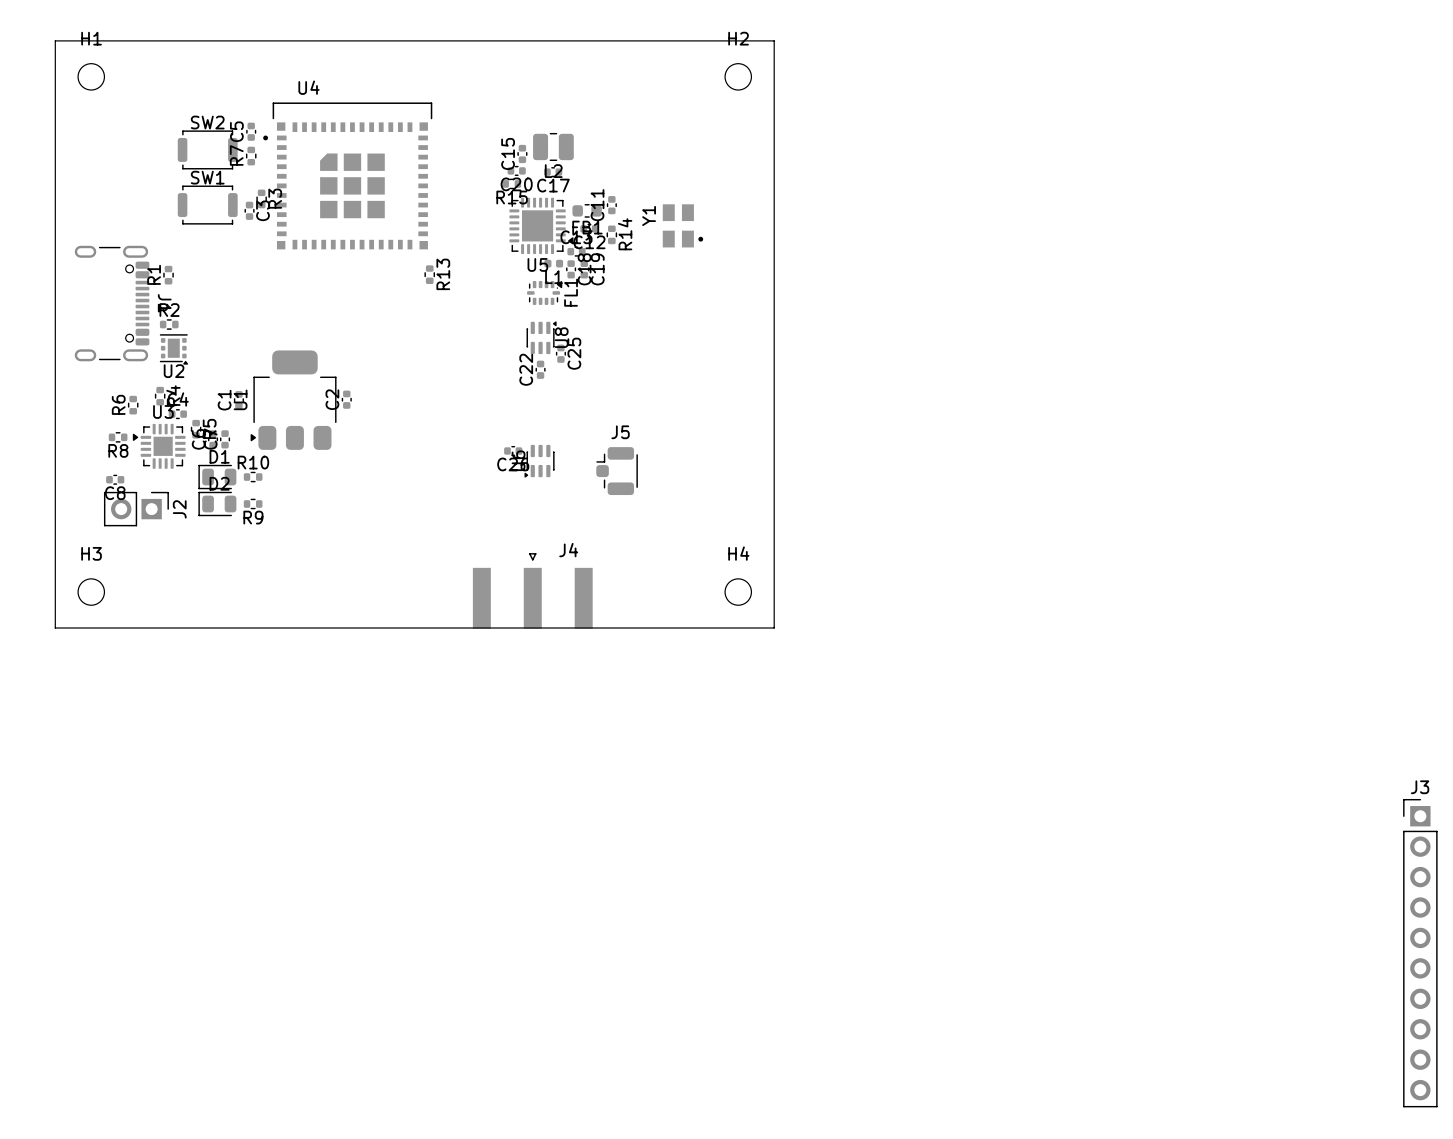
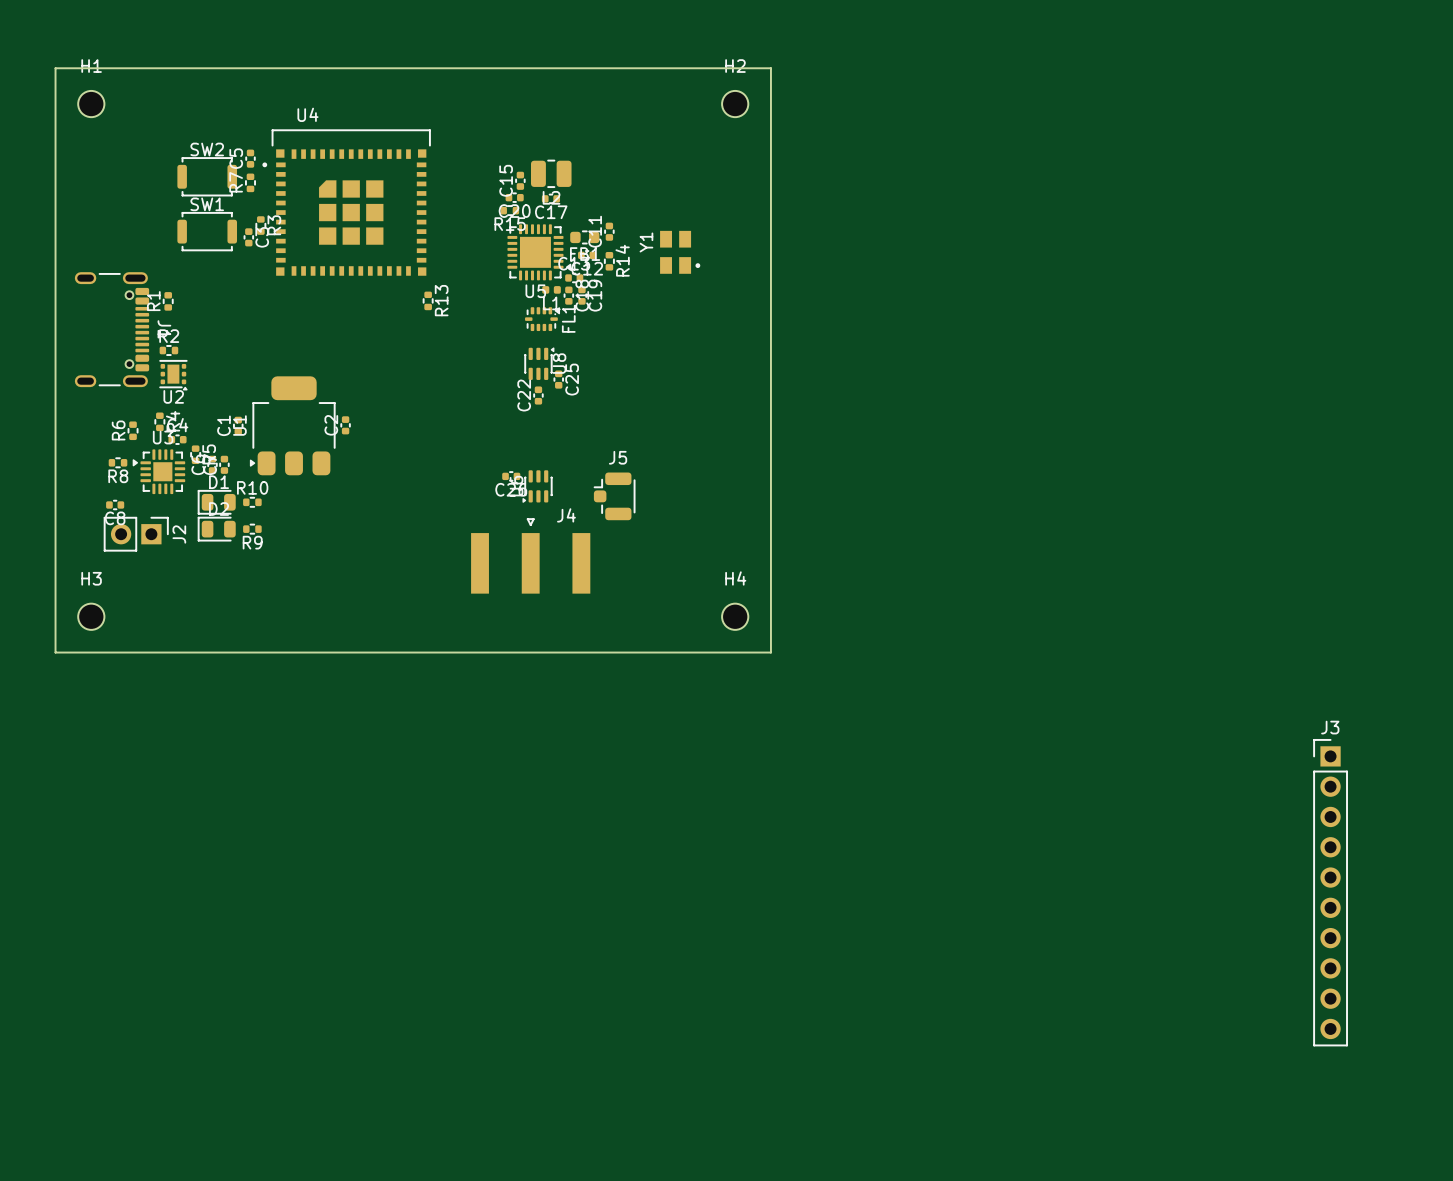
J4 position: (532, 590) -> (530, 556)
J3 position: (1420, 953) -> (1330, 892)

